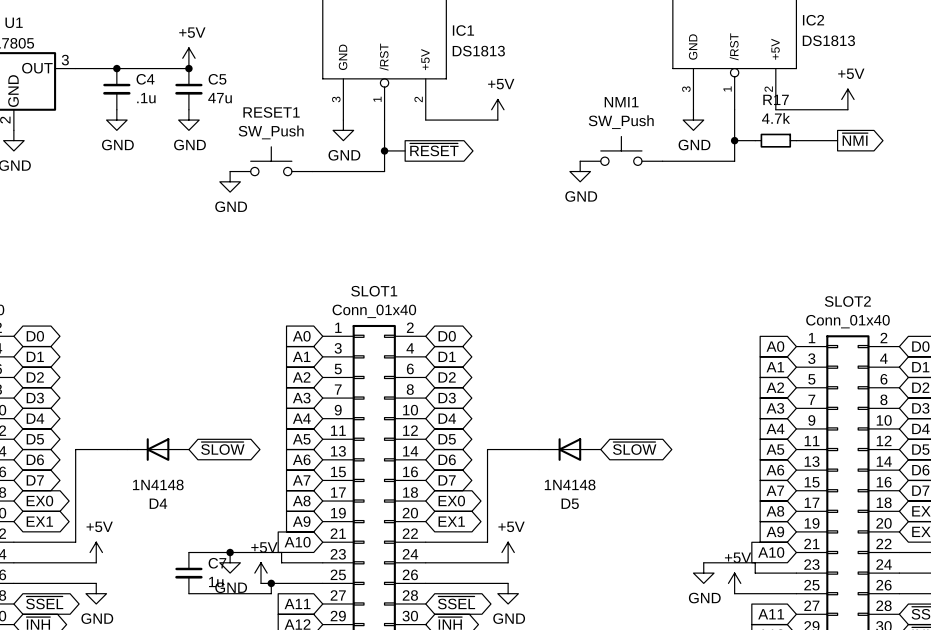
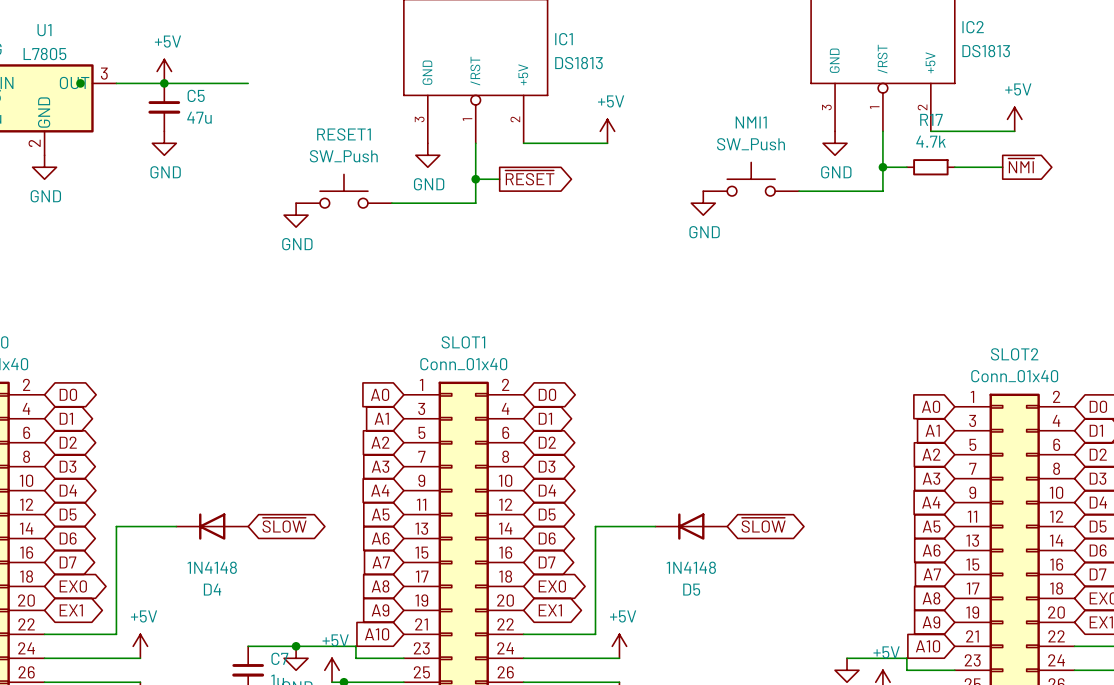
power symbol position: +5V (188, 58) -> +5V (164, 71)
junction: none -> (80, 83)
junction: (188, 68) -> none
C4 name: C4 (145, 79) -> C5 (196, 95)
C5: 47u (188, 89) -> none
C4 value: .1u (146, 98) -> 47u (199, 117)
power symbol: GND (188, 120) -> none

